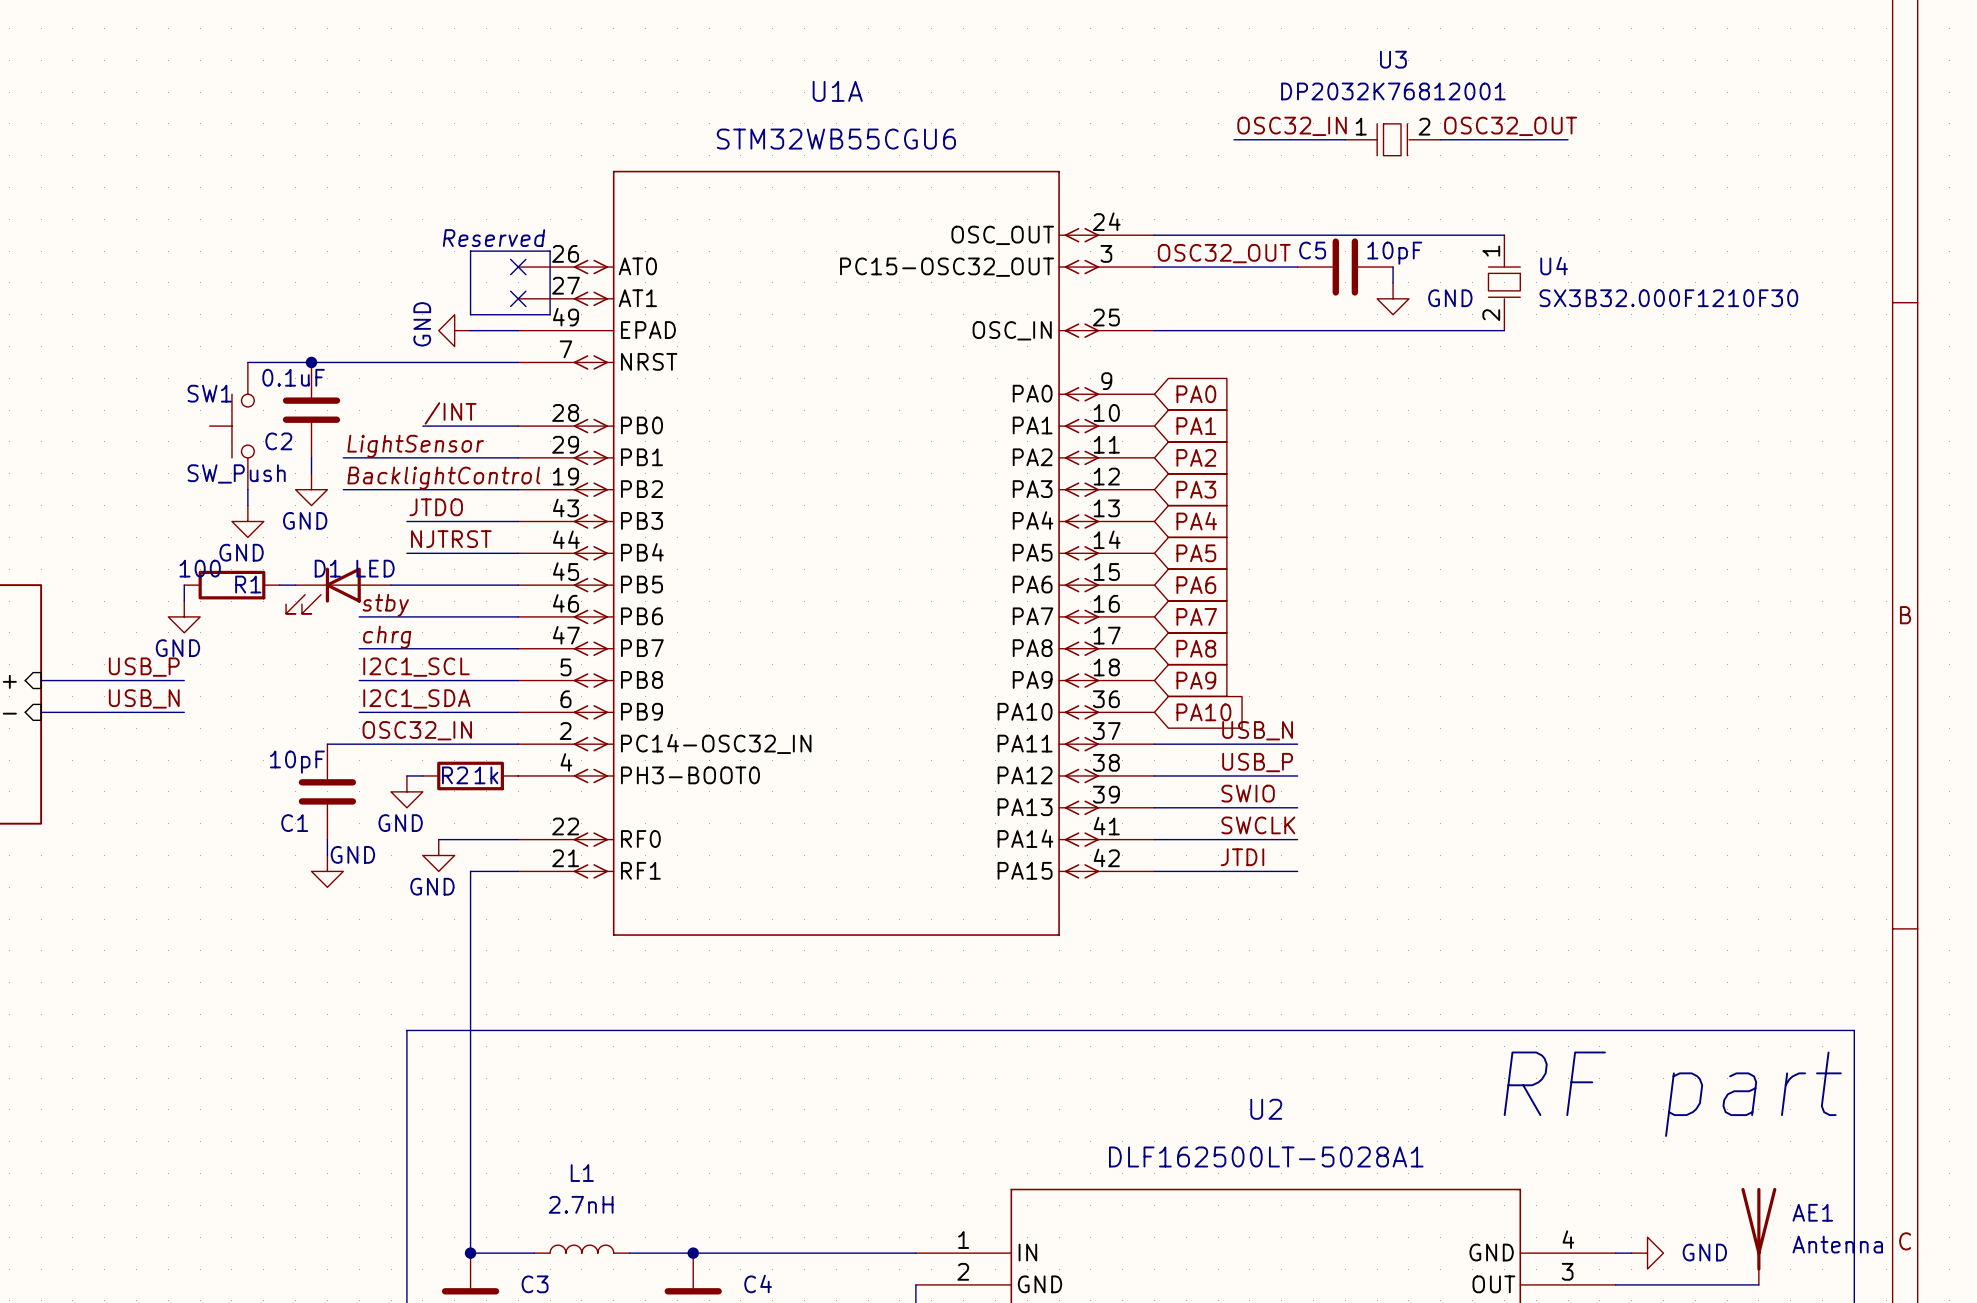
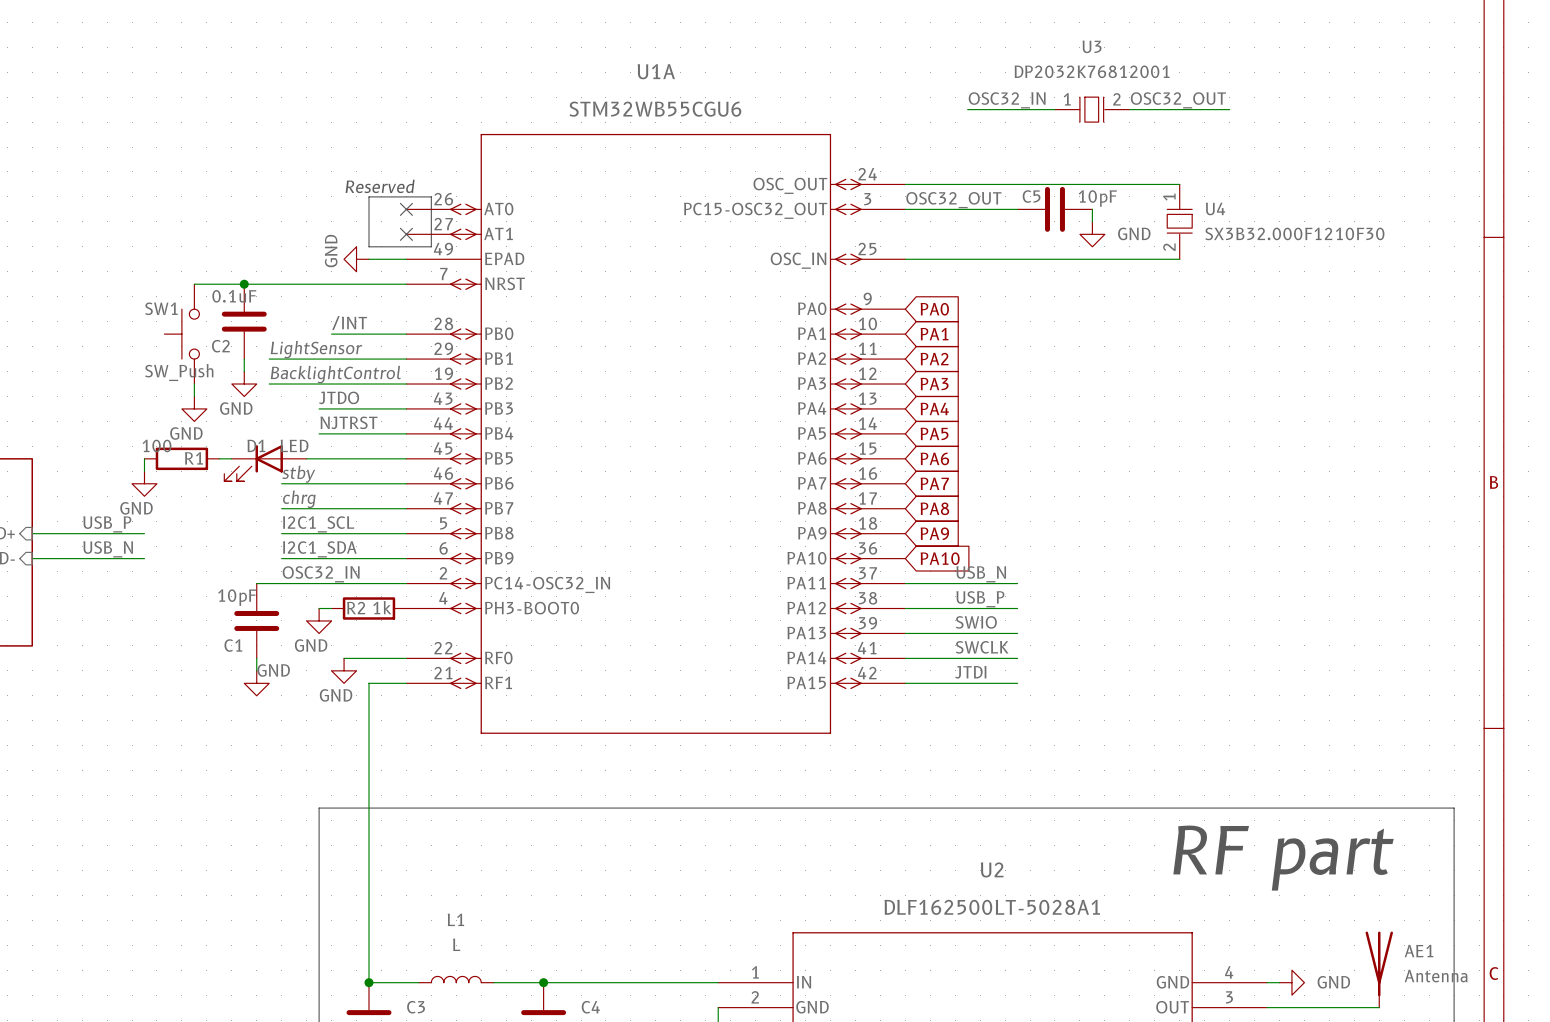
L1 value: 2.7nH (581, 1204) -> L (456, 944)

